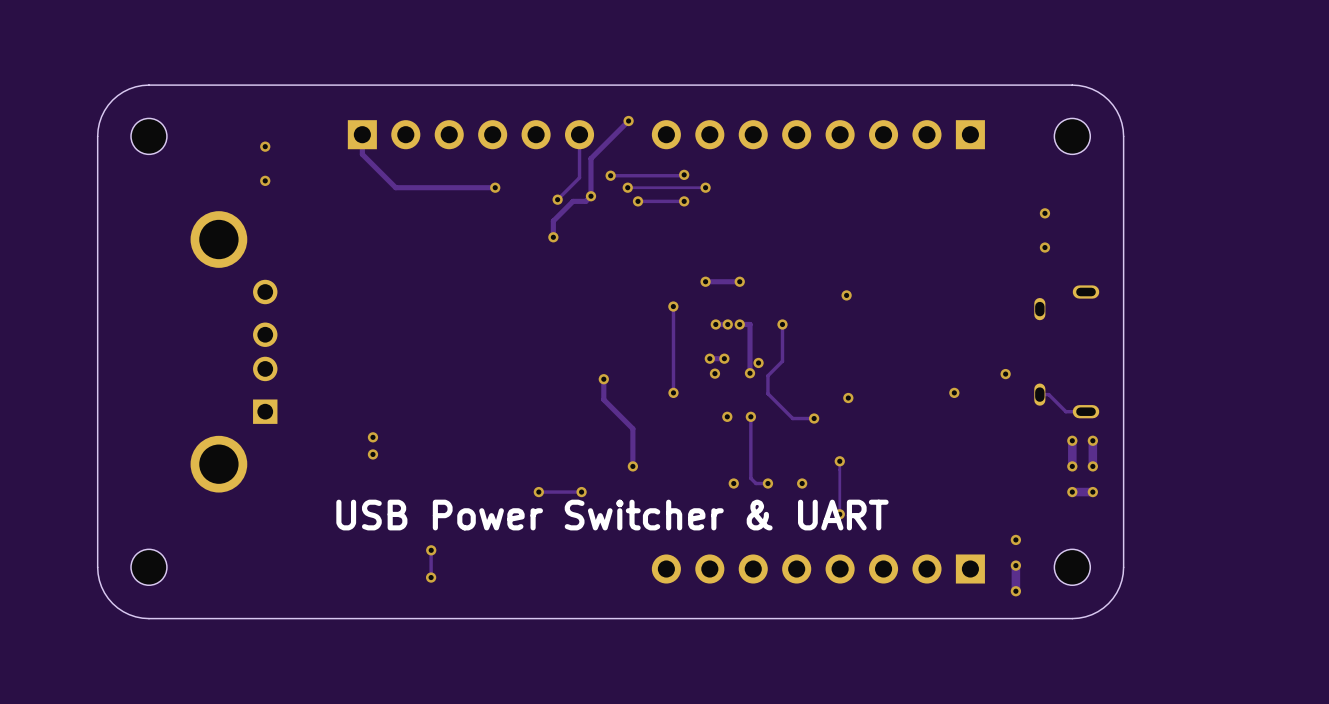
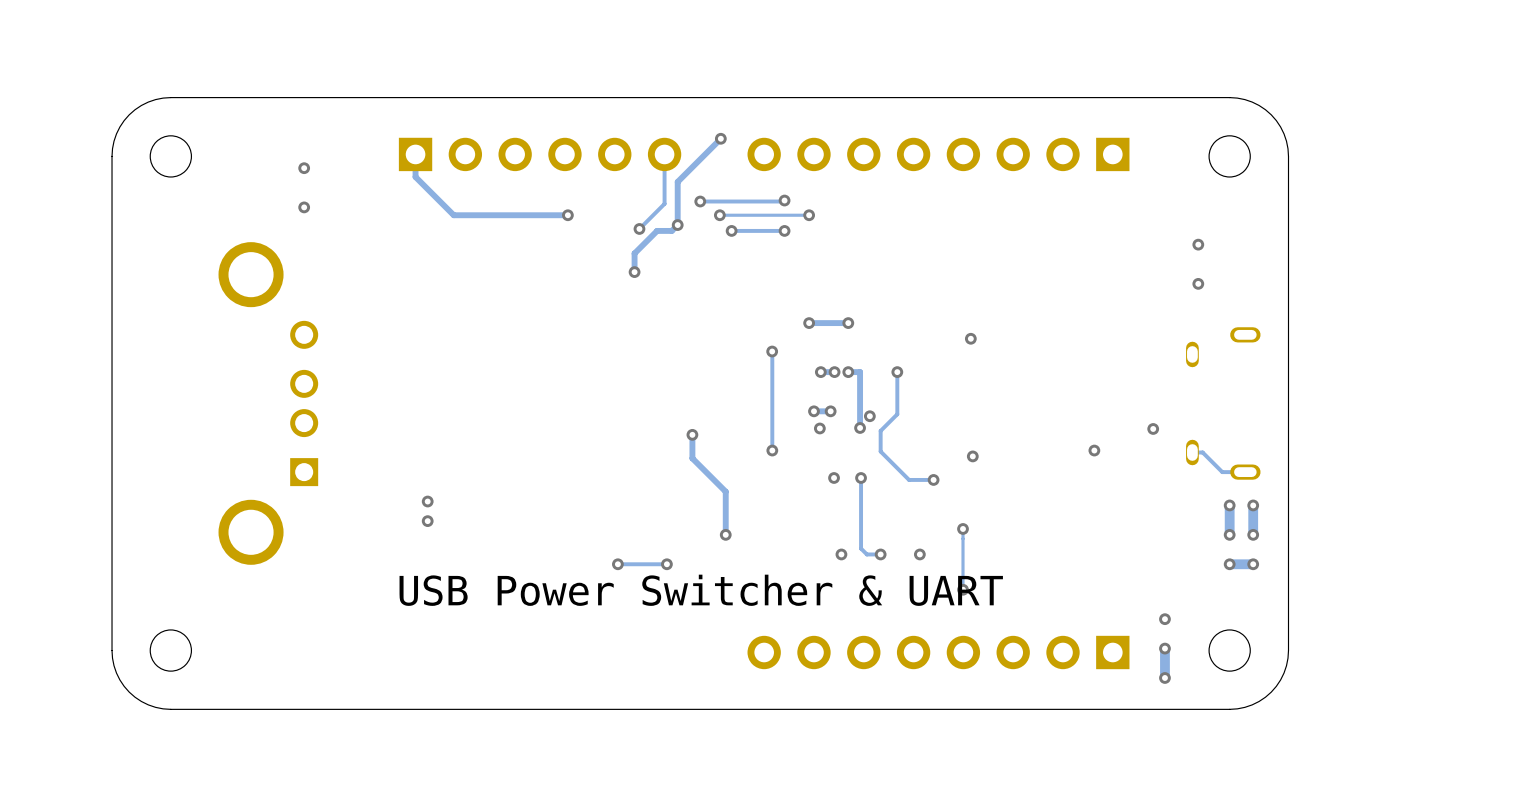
track: (431, 550) (431, 577) -> none
via: (431, 550) -> none
via: (431, 577) -> none

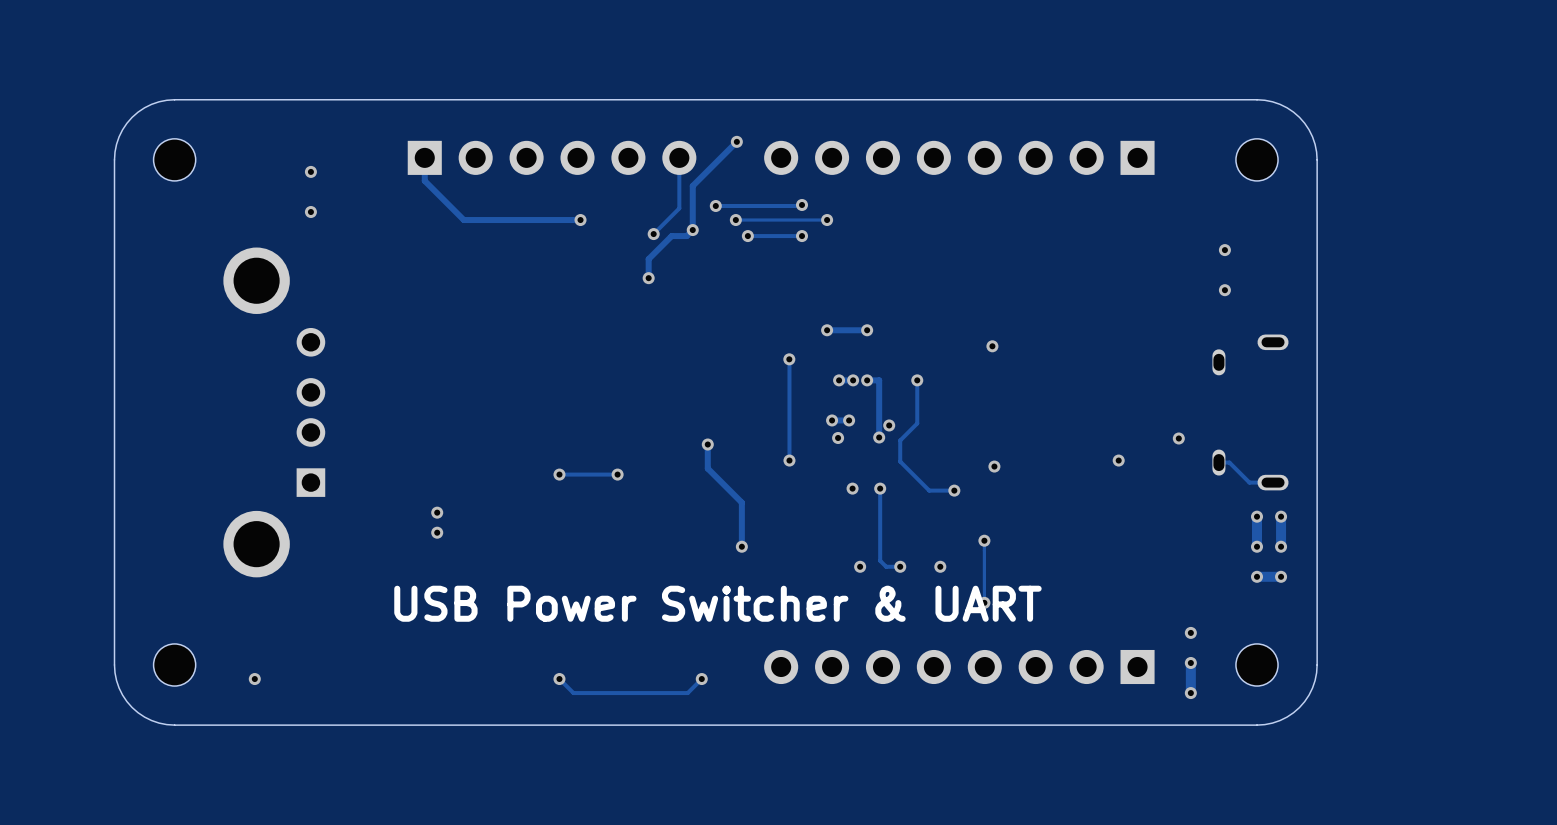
via: none -> (559, 474)
track: none -> (617, 474) (559, 474)
via: none -> (617, 474)
via: (617, 564) -> none
track: (666, 564) (617, 564) -> none
via: (666, 564) -> none
via: none -> (254, 679)
via: none -> (559, 679)
track: none -> (701, 679) (687, 693) (573, 693) (559, 679)
via: none -> (701, 679)

